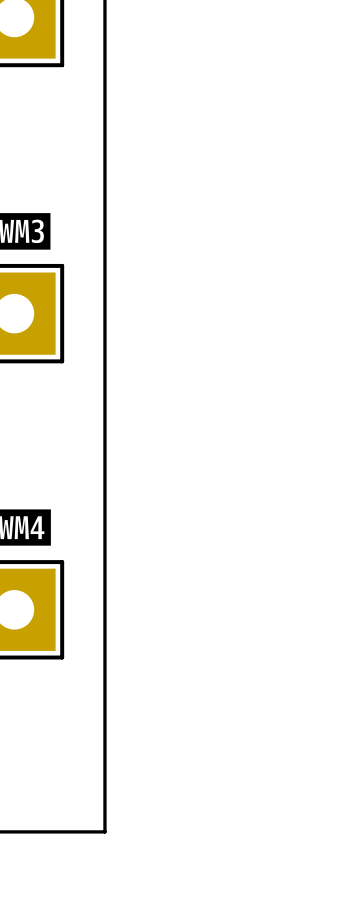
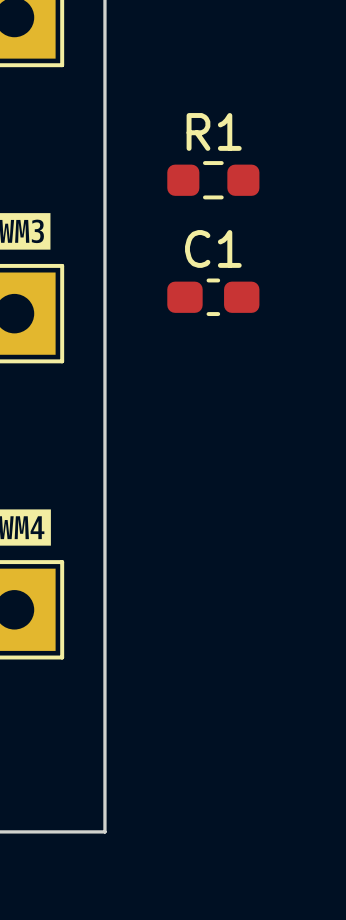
R1: none -> (213, 180)
C1: none -> (213, 297)

